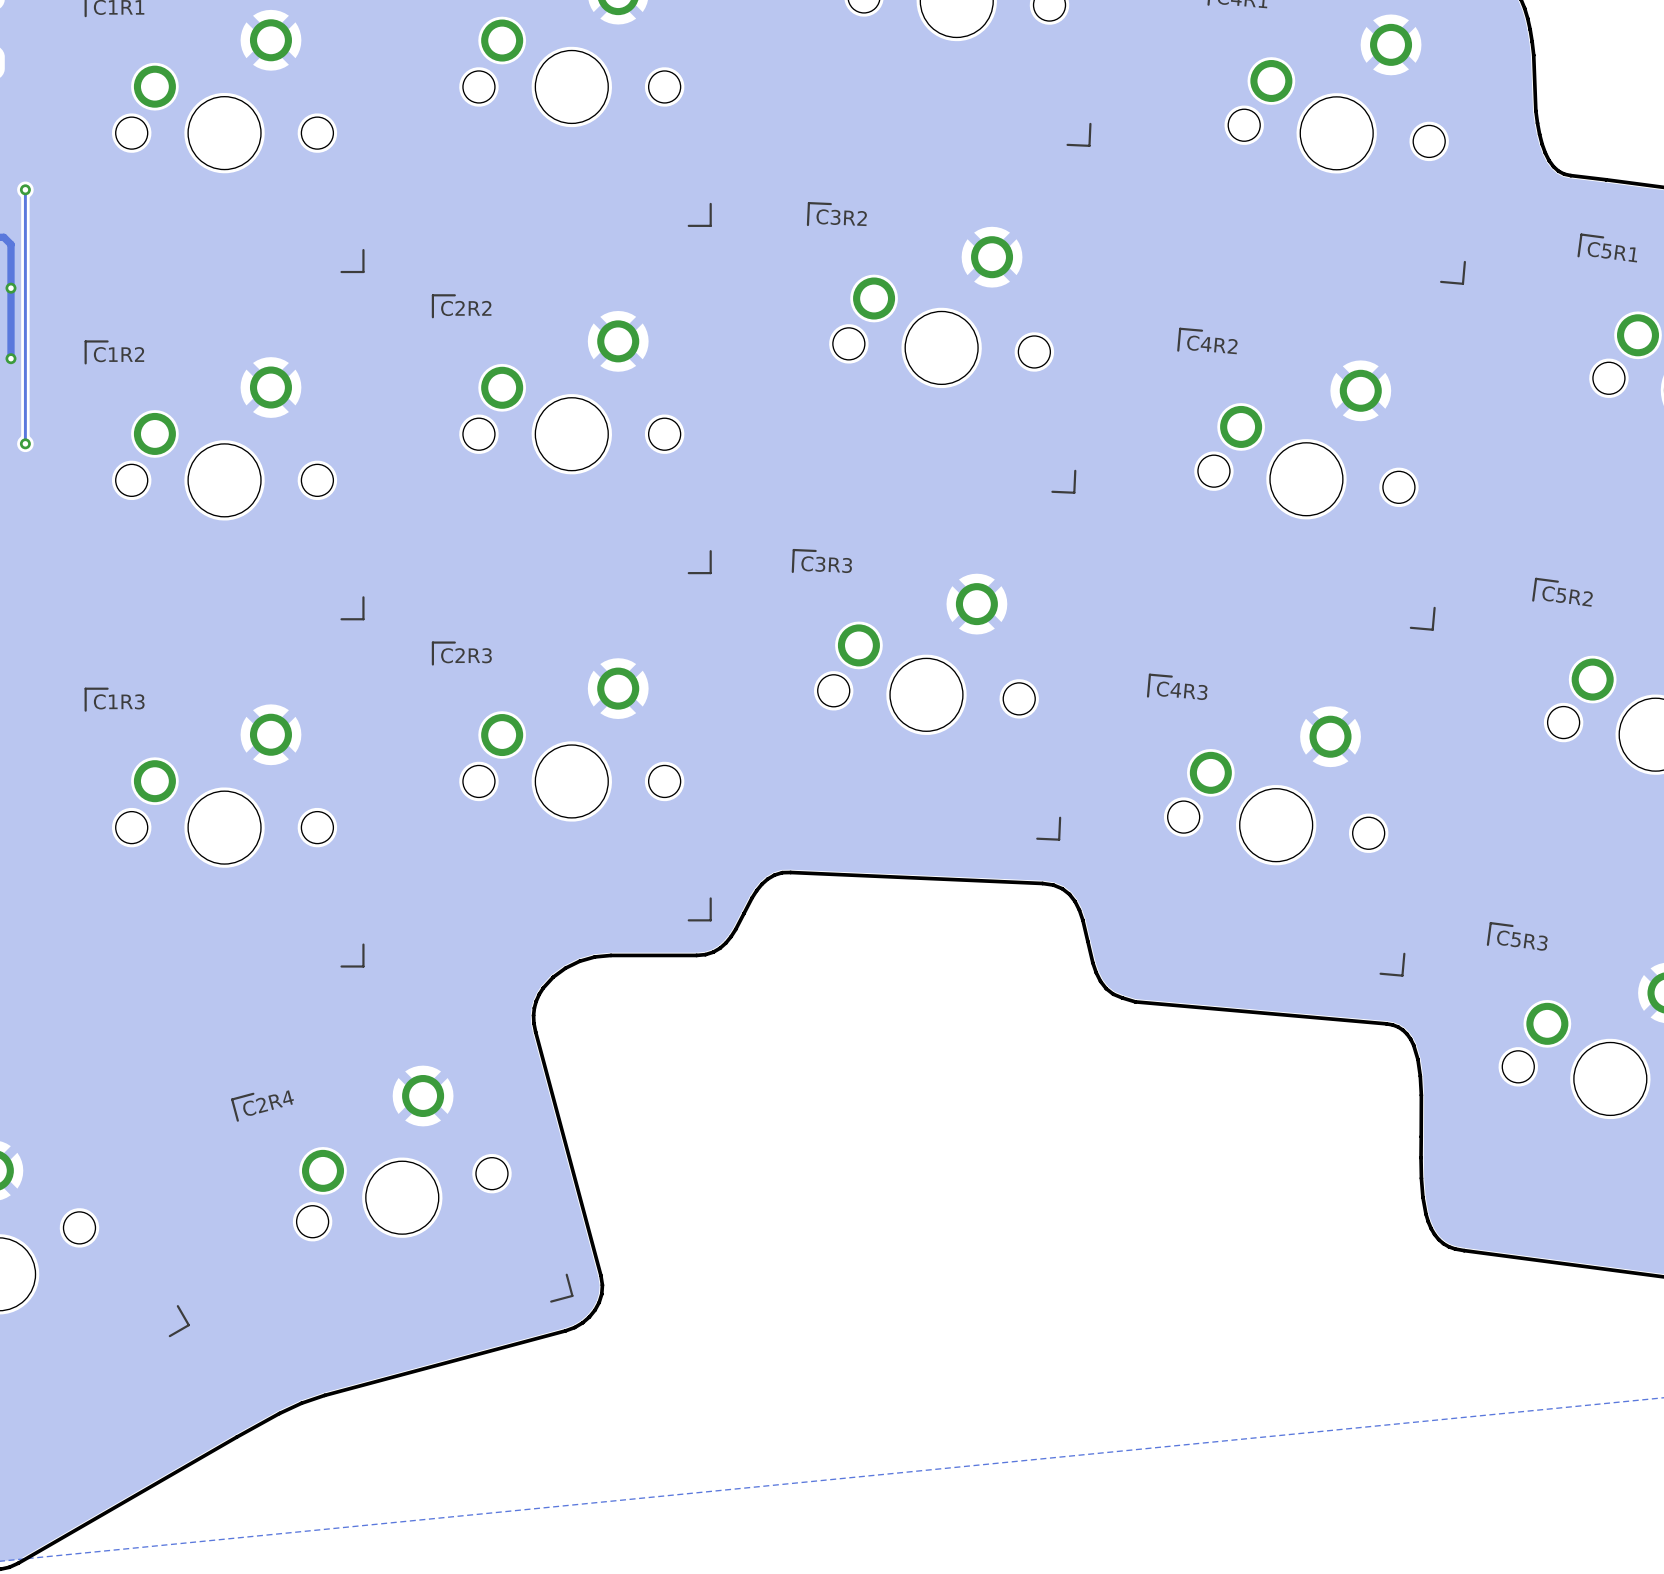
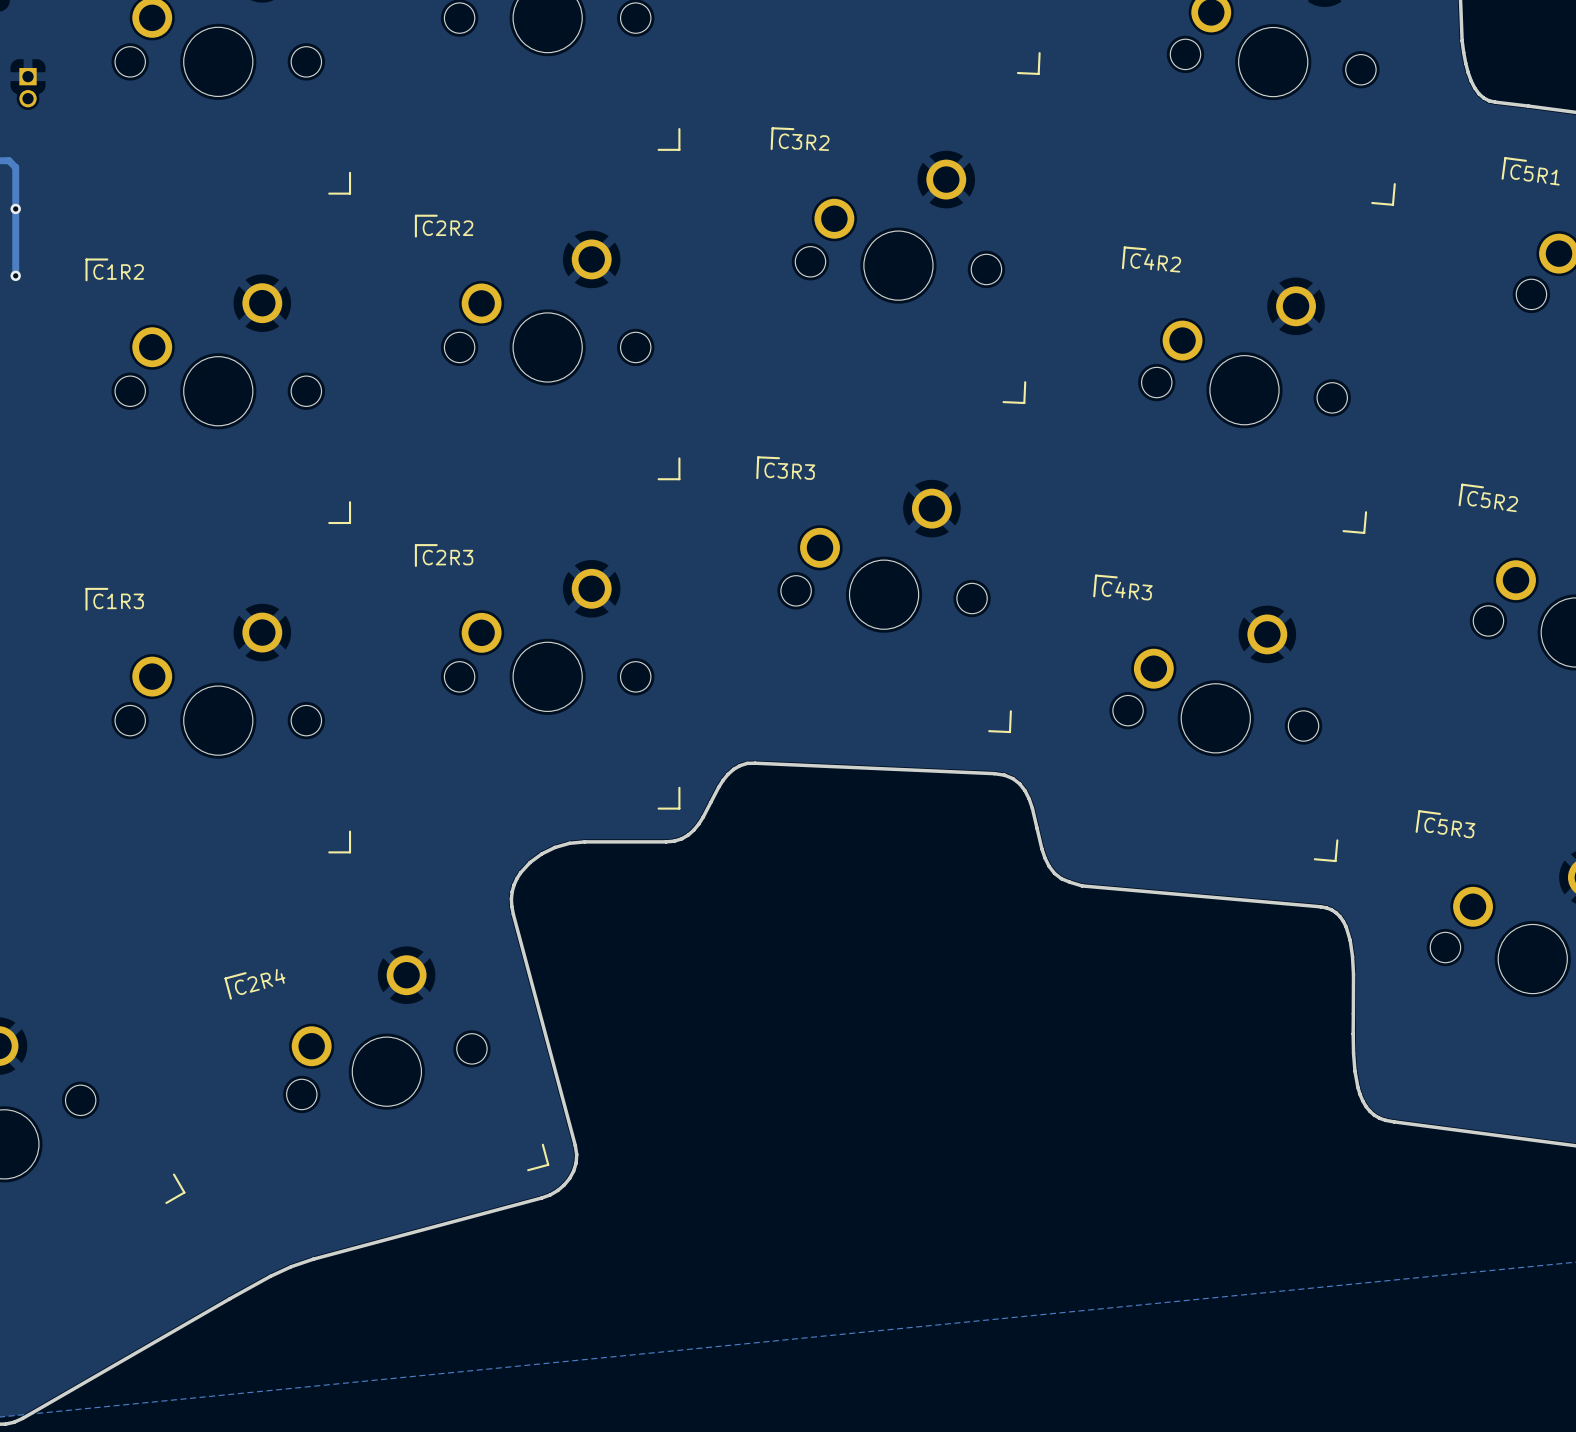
part: none -> (28, 87)
track: (25, 189) (25, 443) -> none
via: (25, 189) -> none
via: (25, 443) -> none

